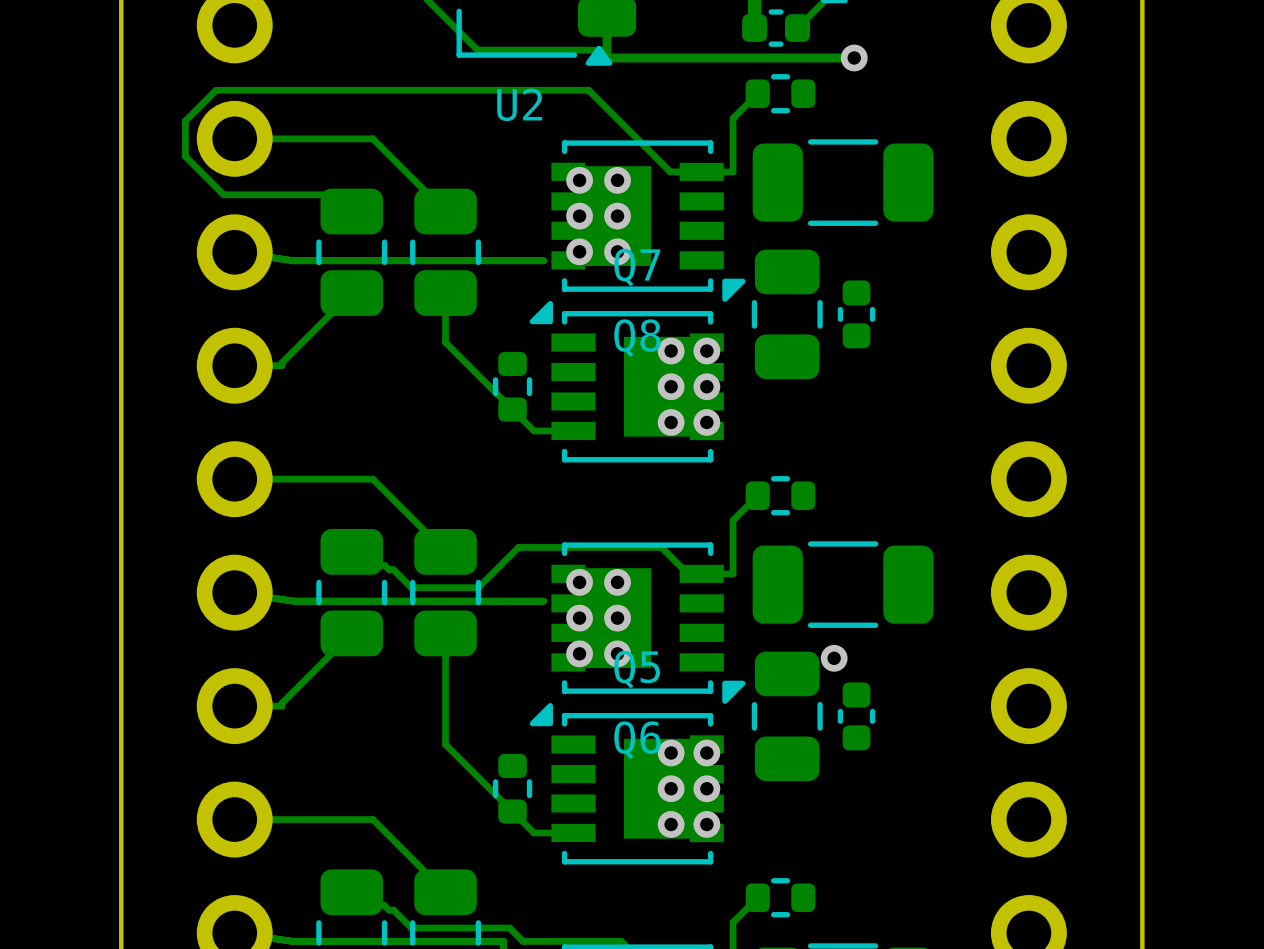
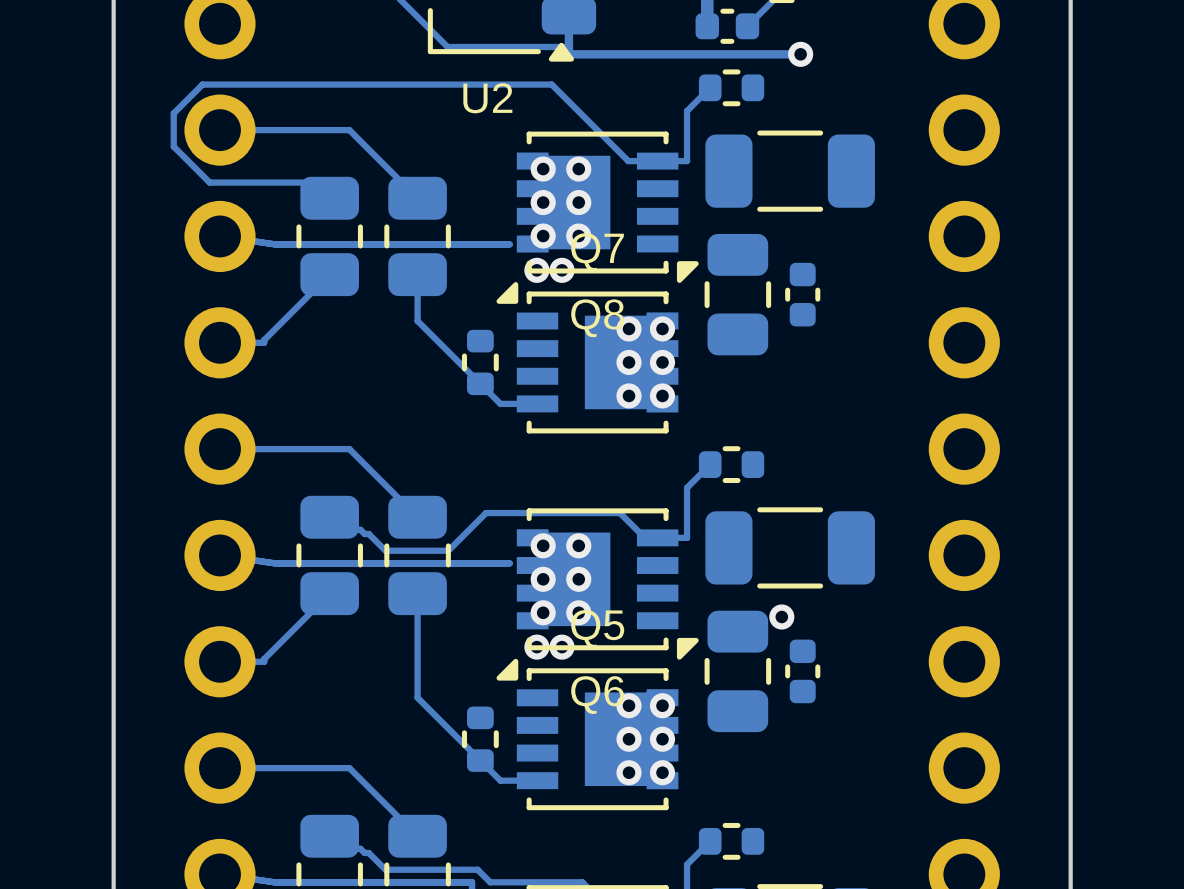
via: none -> (536, 270)
via: none -> (562, 270)
via: none -> (536, 647)
via: none -> (562, 647)

